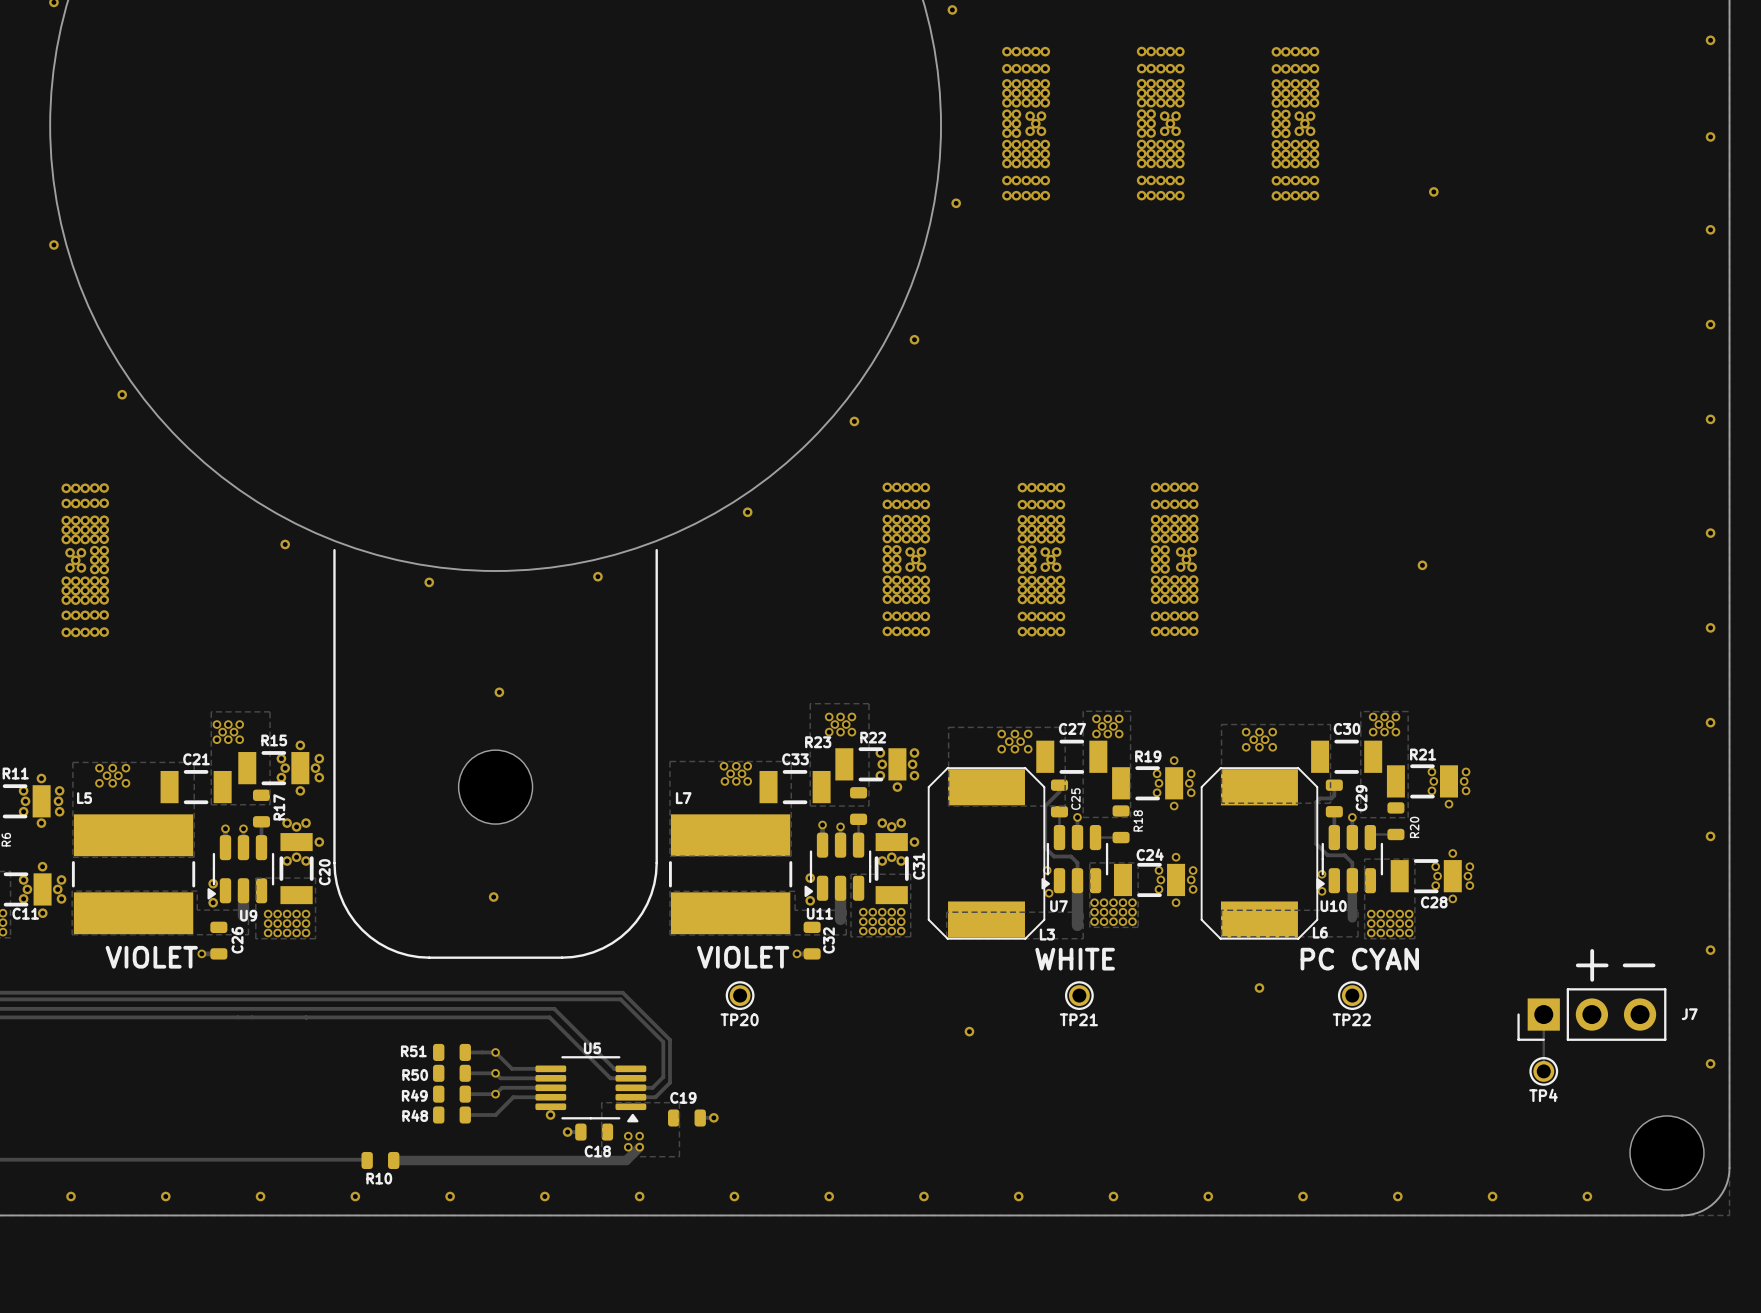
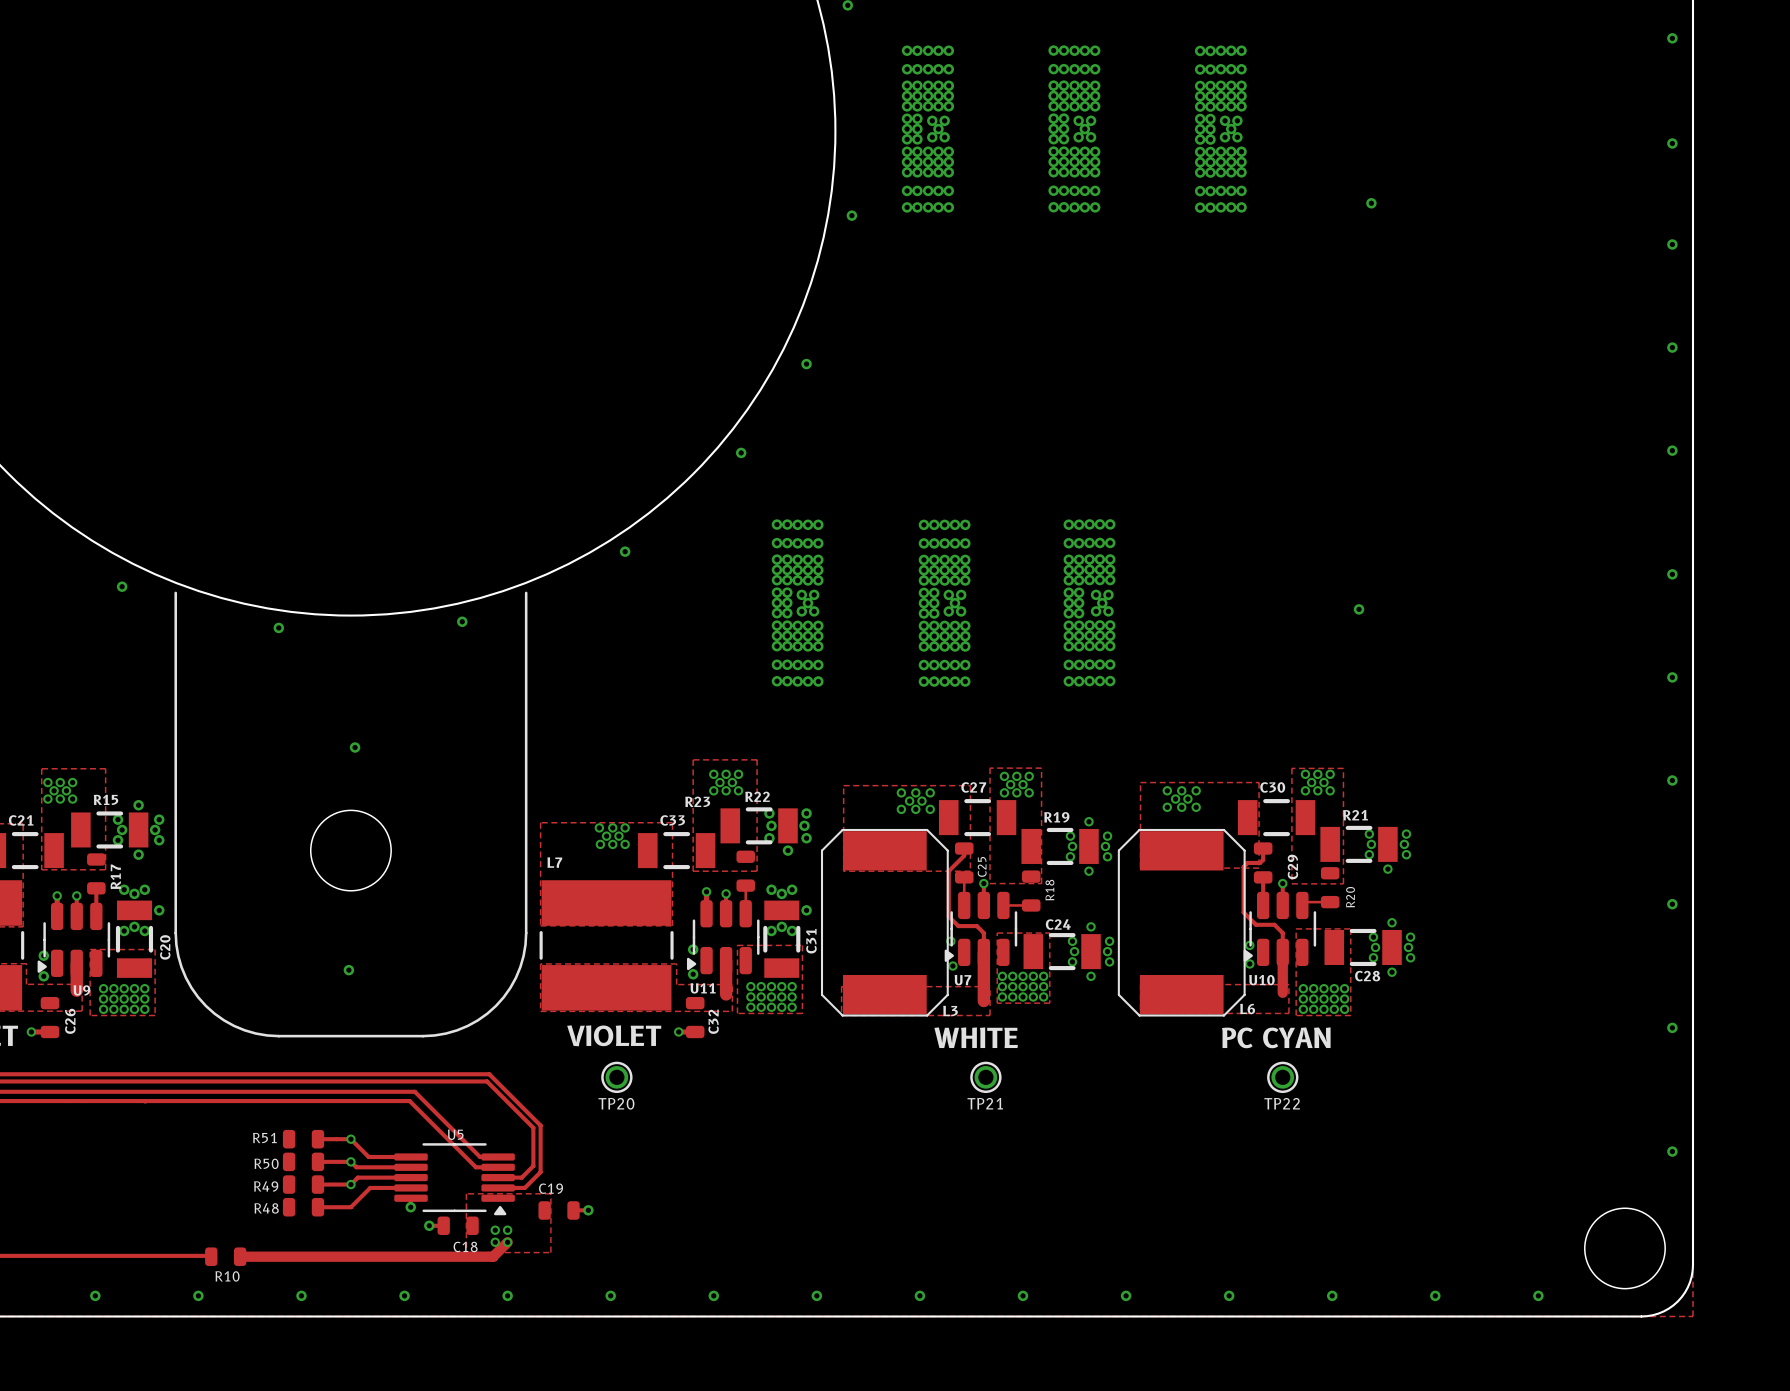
text: -+ (1615, 965) -> none
via: (1259, 988) -> none
track: (1543, 1014) (1543, 1071) -> none
J7: (1591, 1014) -> none
via: (969, 1031) -> none
TP4: (1543, 1071) -> none

